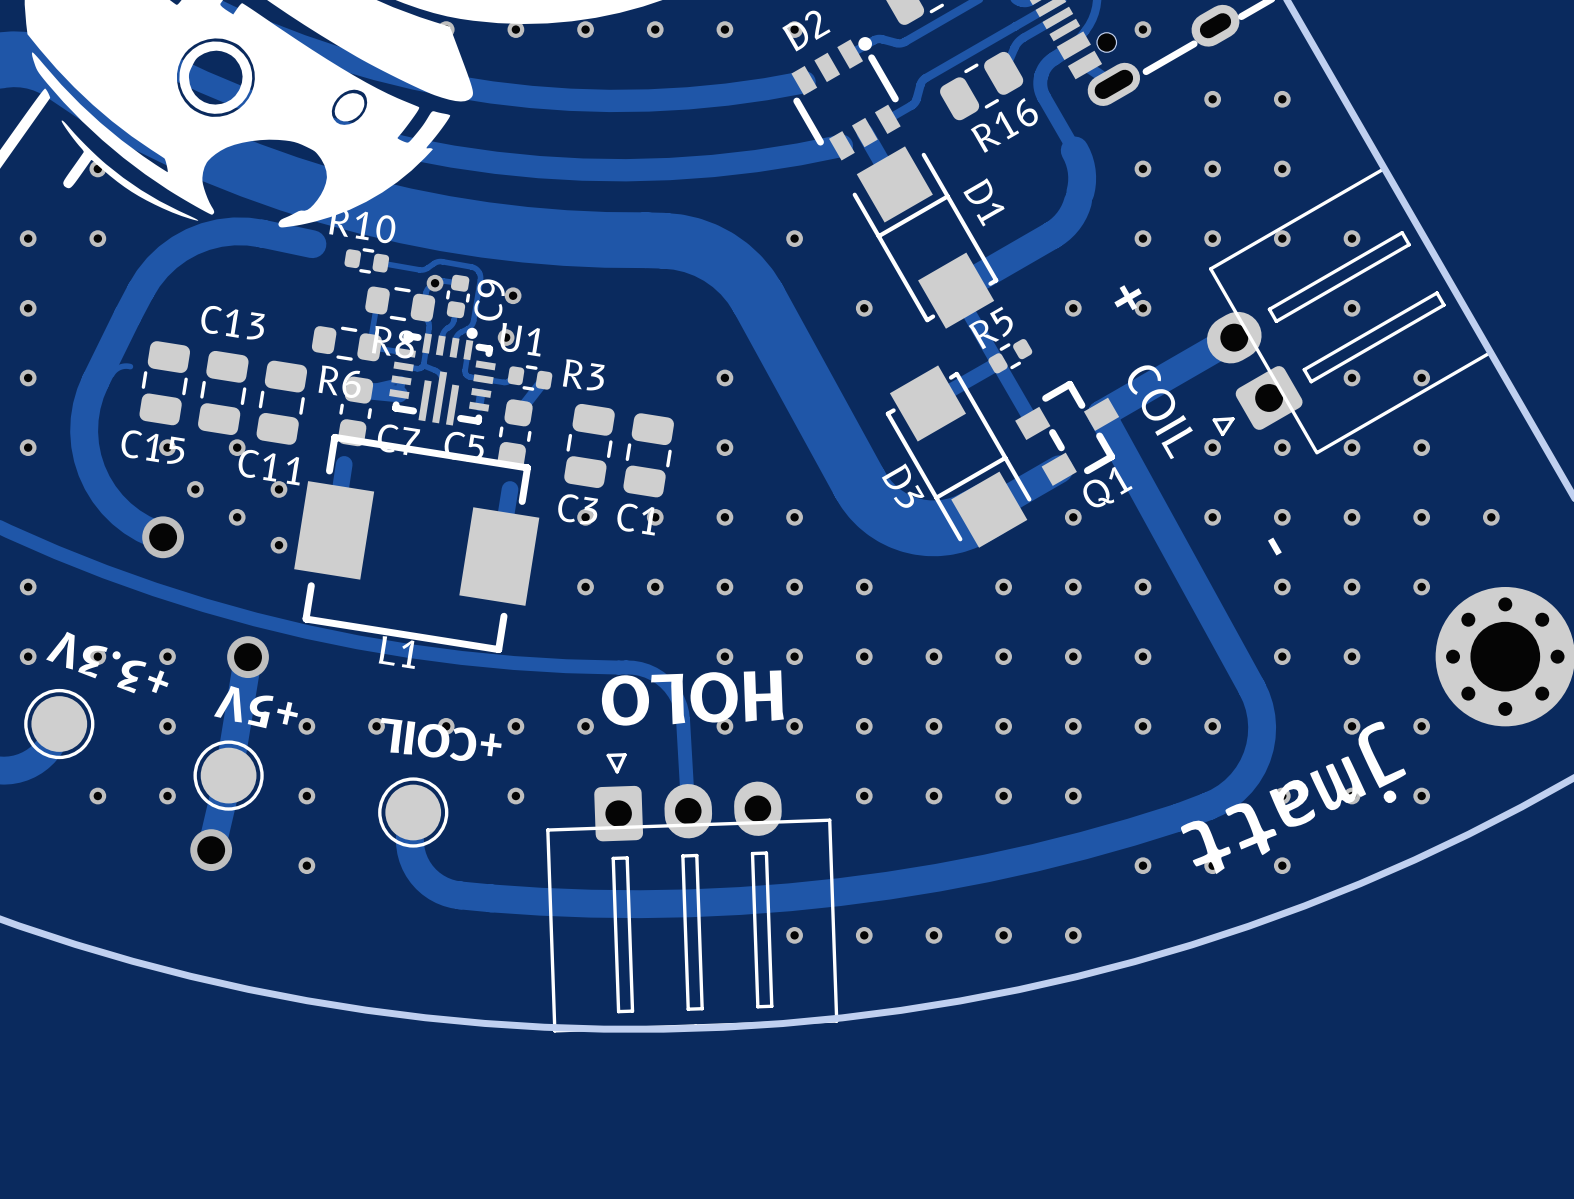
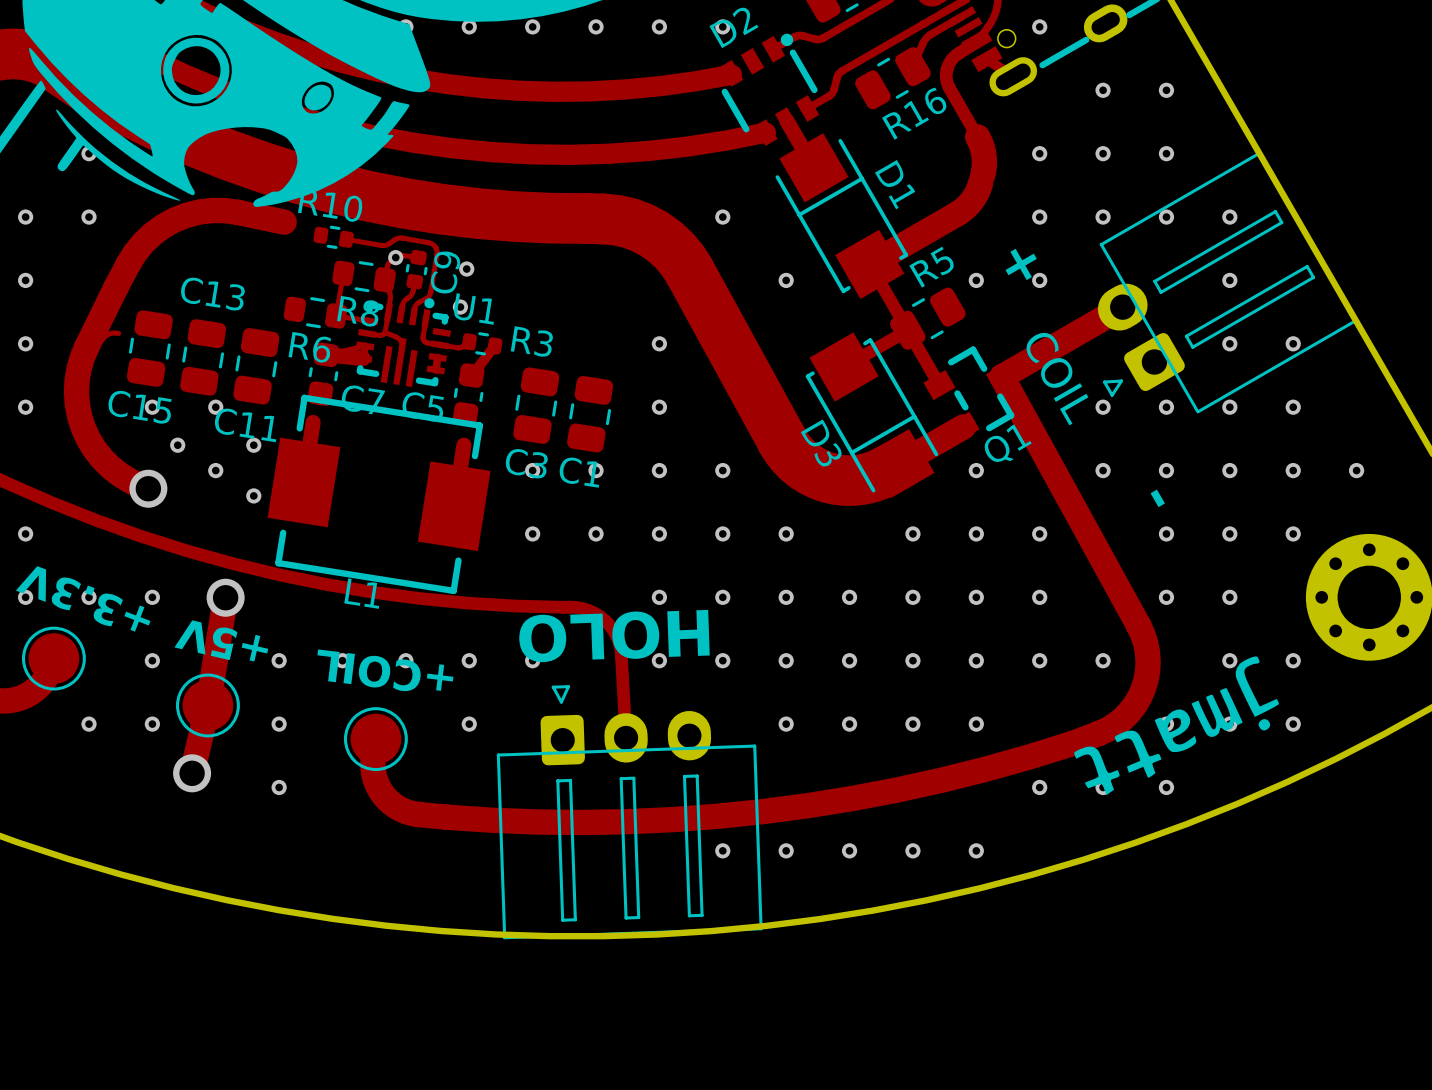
R5 name position: R5 (990, 327) -> R5 (931, 267)
R5 footprint: [988, 339, 1033, 374] -> [889, 287, 966, 350]

